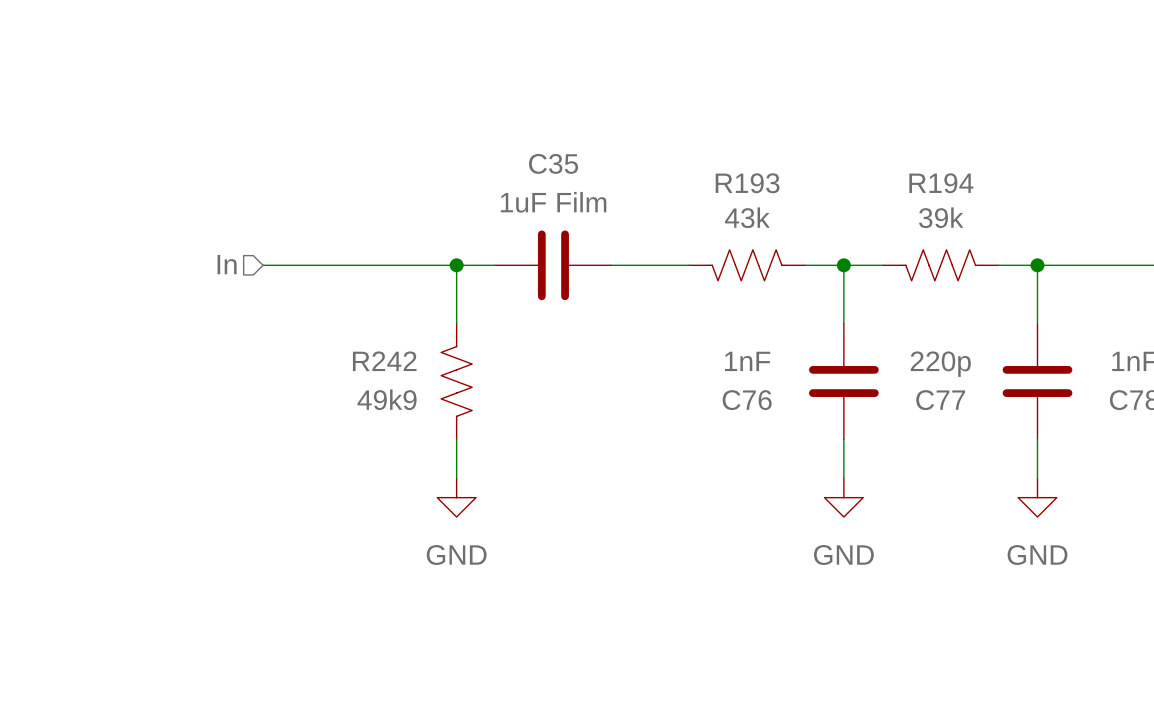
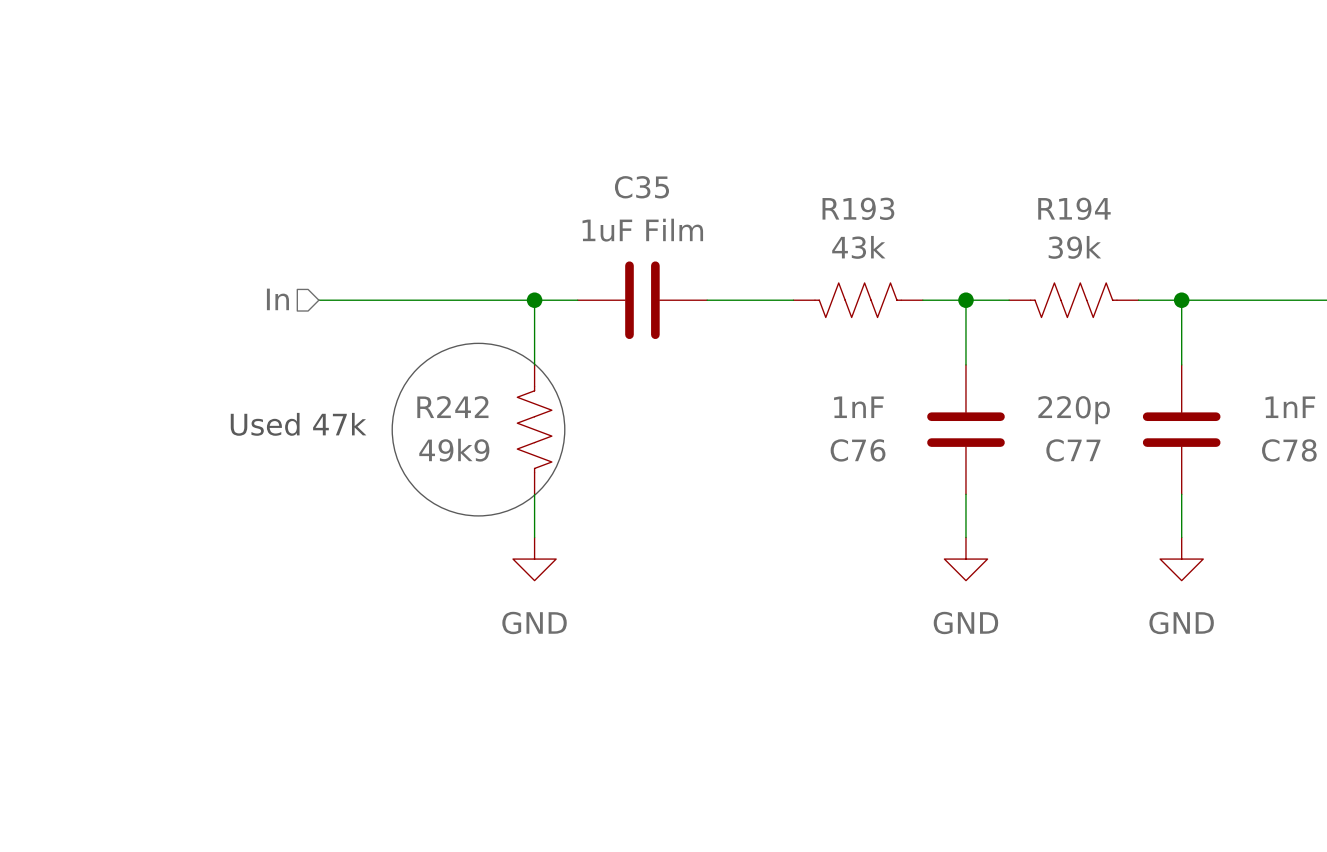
drawing: none -> [392, 343, 565, 516]
text: none -> Used 47k (298, 424)

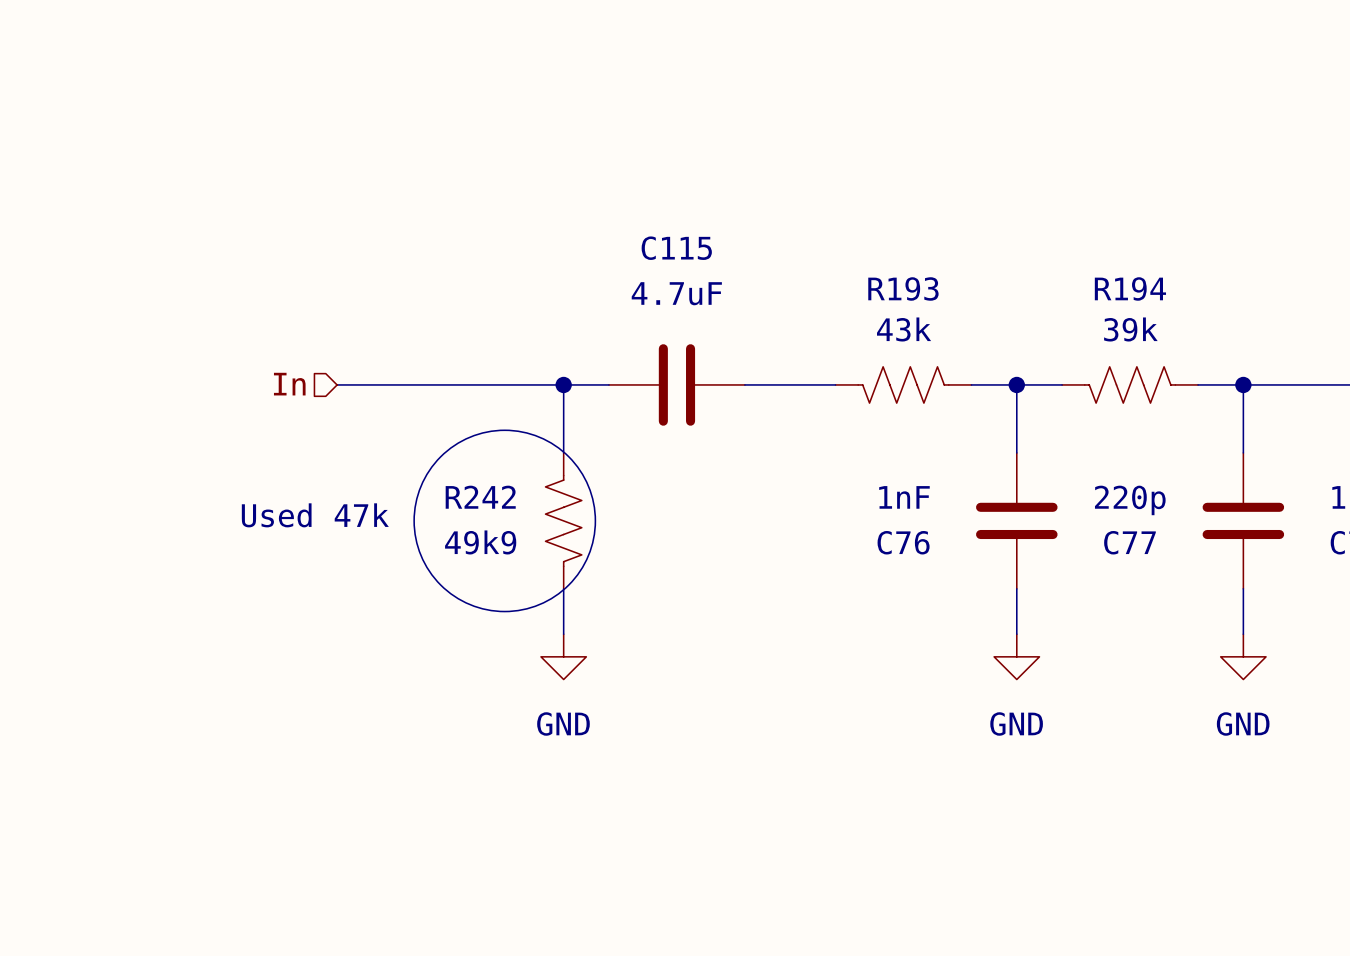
C35 name: C35 (641, 187) -> C115 (676, 248)
C35 value: 1uF Film (642, 230) -> 4.7uF (676, 293)

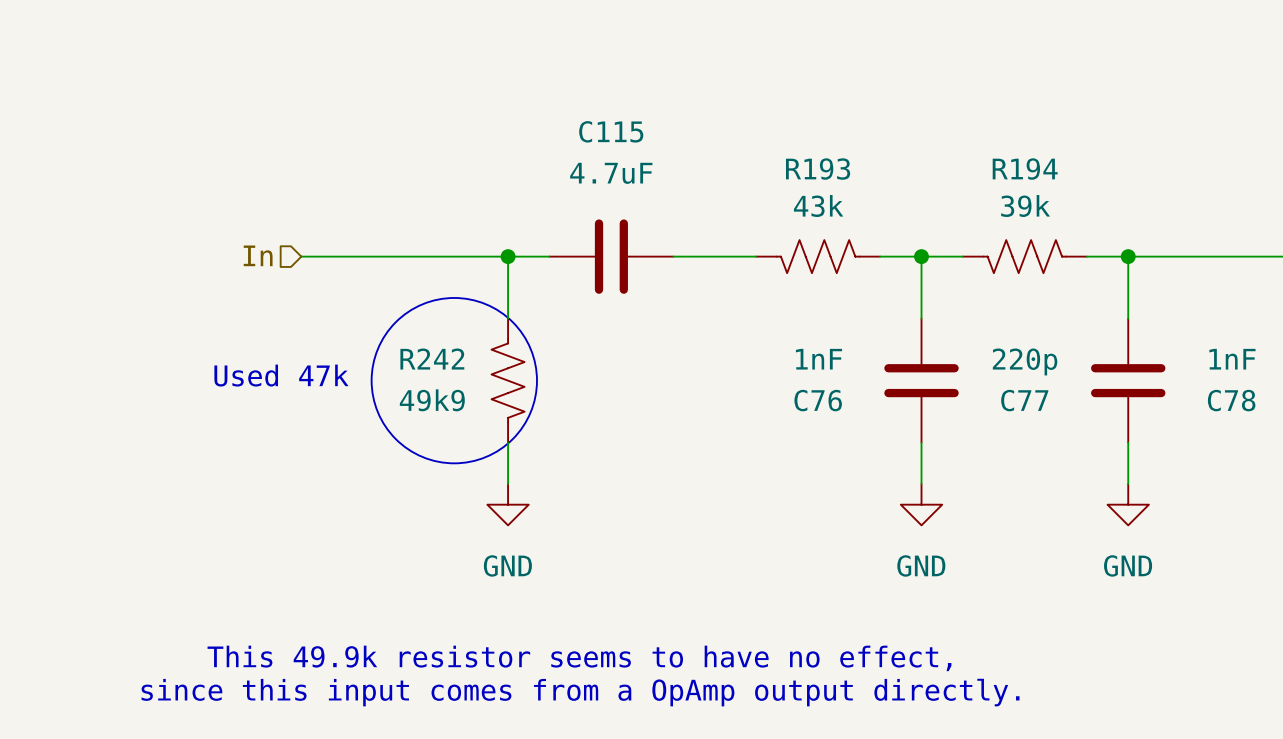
text: none -> This 49.9k resistor seems to have no effect, (579, 658)
text: none -> since this input comes from a OpAmp output directly. (580, 692)

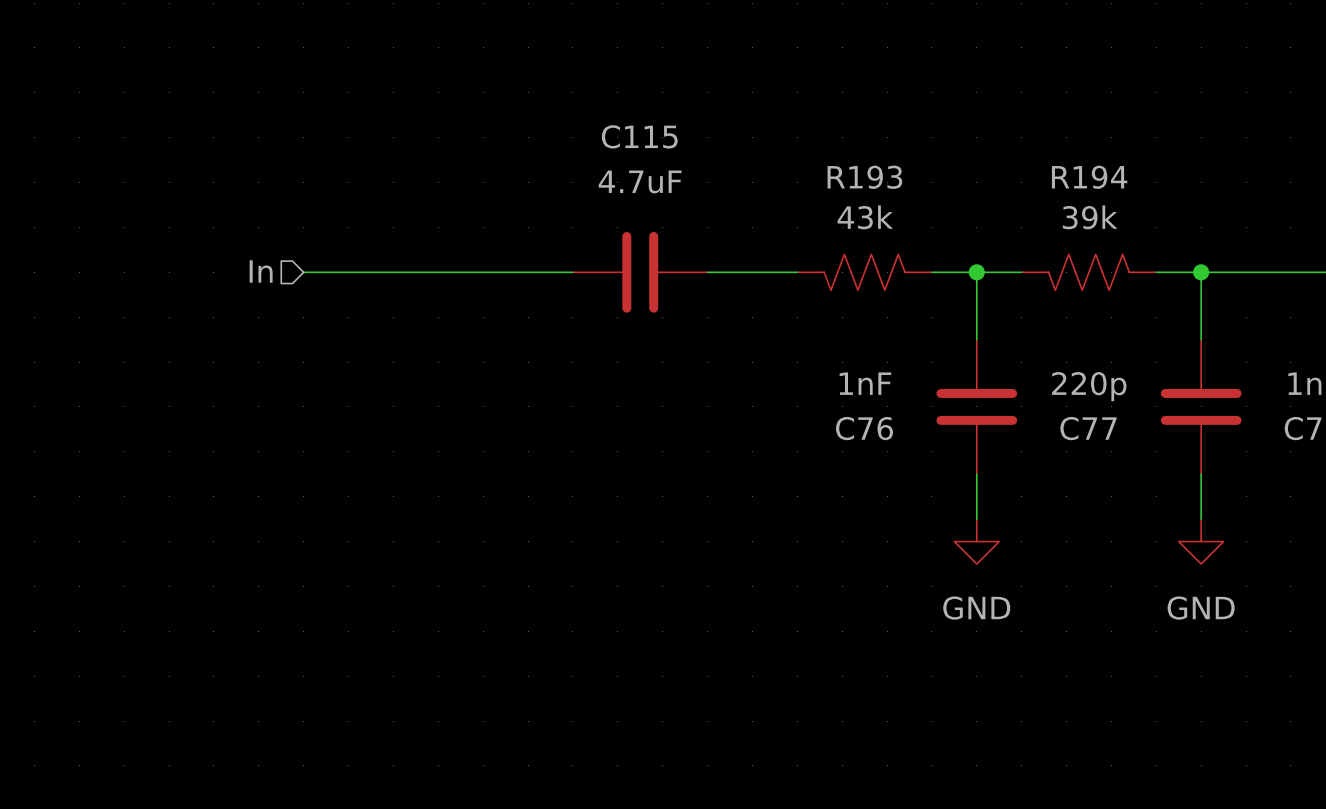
wire: (508, 256) (508, 318) -> none
junction: (508, 256) -> none
drawing: [371, 297, 538, 464] -> none
text: Used 47k (281, 375) -> none
R242: 49k9 (508, 380) -> none
wire: (508, 442) (508, 484) -> none
power symbol: GND (508, 504) -> none
text: This 49.9k resistor seems to have no effect, (579, 658) -> none
text: since this input comes from a OpAmp output directly. (580, 692) -> none

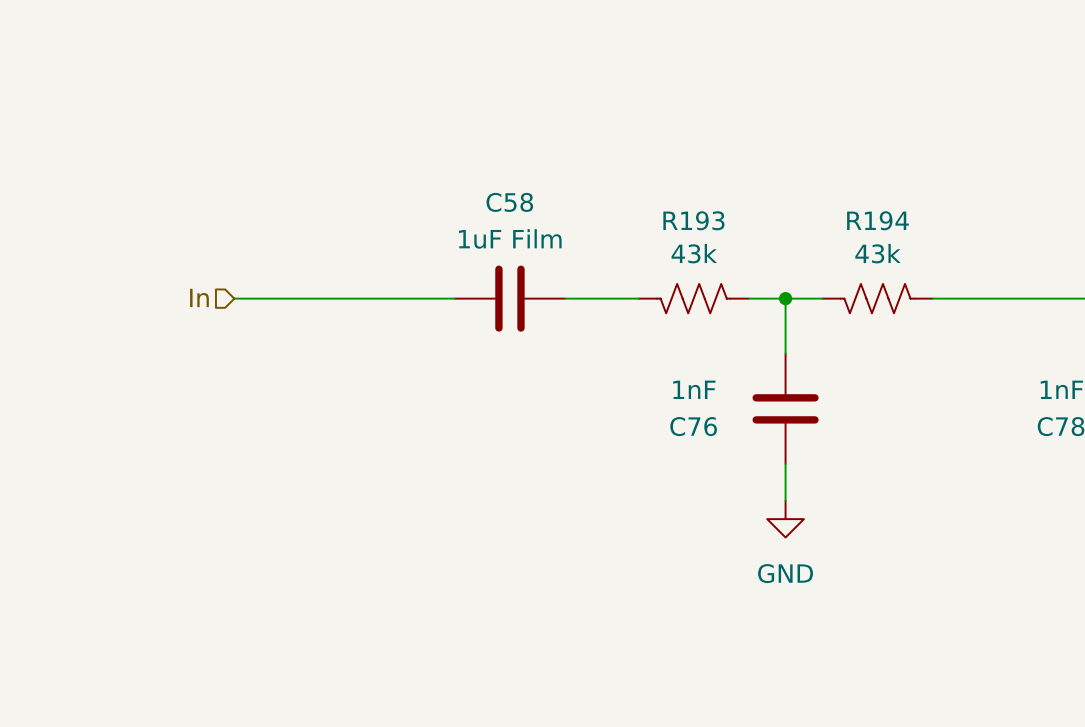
C115 name: C115 (639, 136) -> C58 (509, 202)
C115 value: 4.7uF (640, 181) -> 1uF Film (510, 238)
R194 value: 39k (1090, 217) -> 43k (878, 253)
wire: (1201, 272) (1201, 339) -> none
junction: (1201, 272) -> none
C77: 220p (1201, 406) -> none
wire: (1201, 474) (1201, 519) -> none
power symbol: GND (1201, 541) -> none

